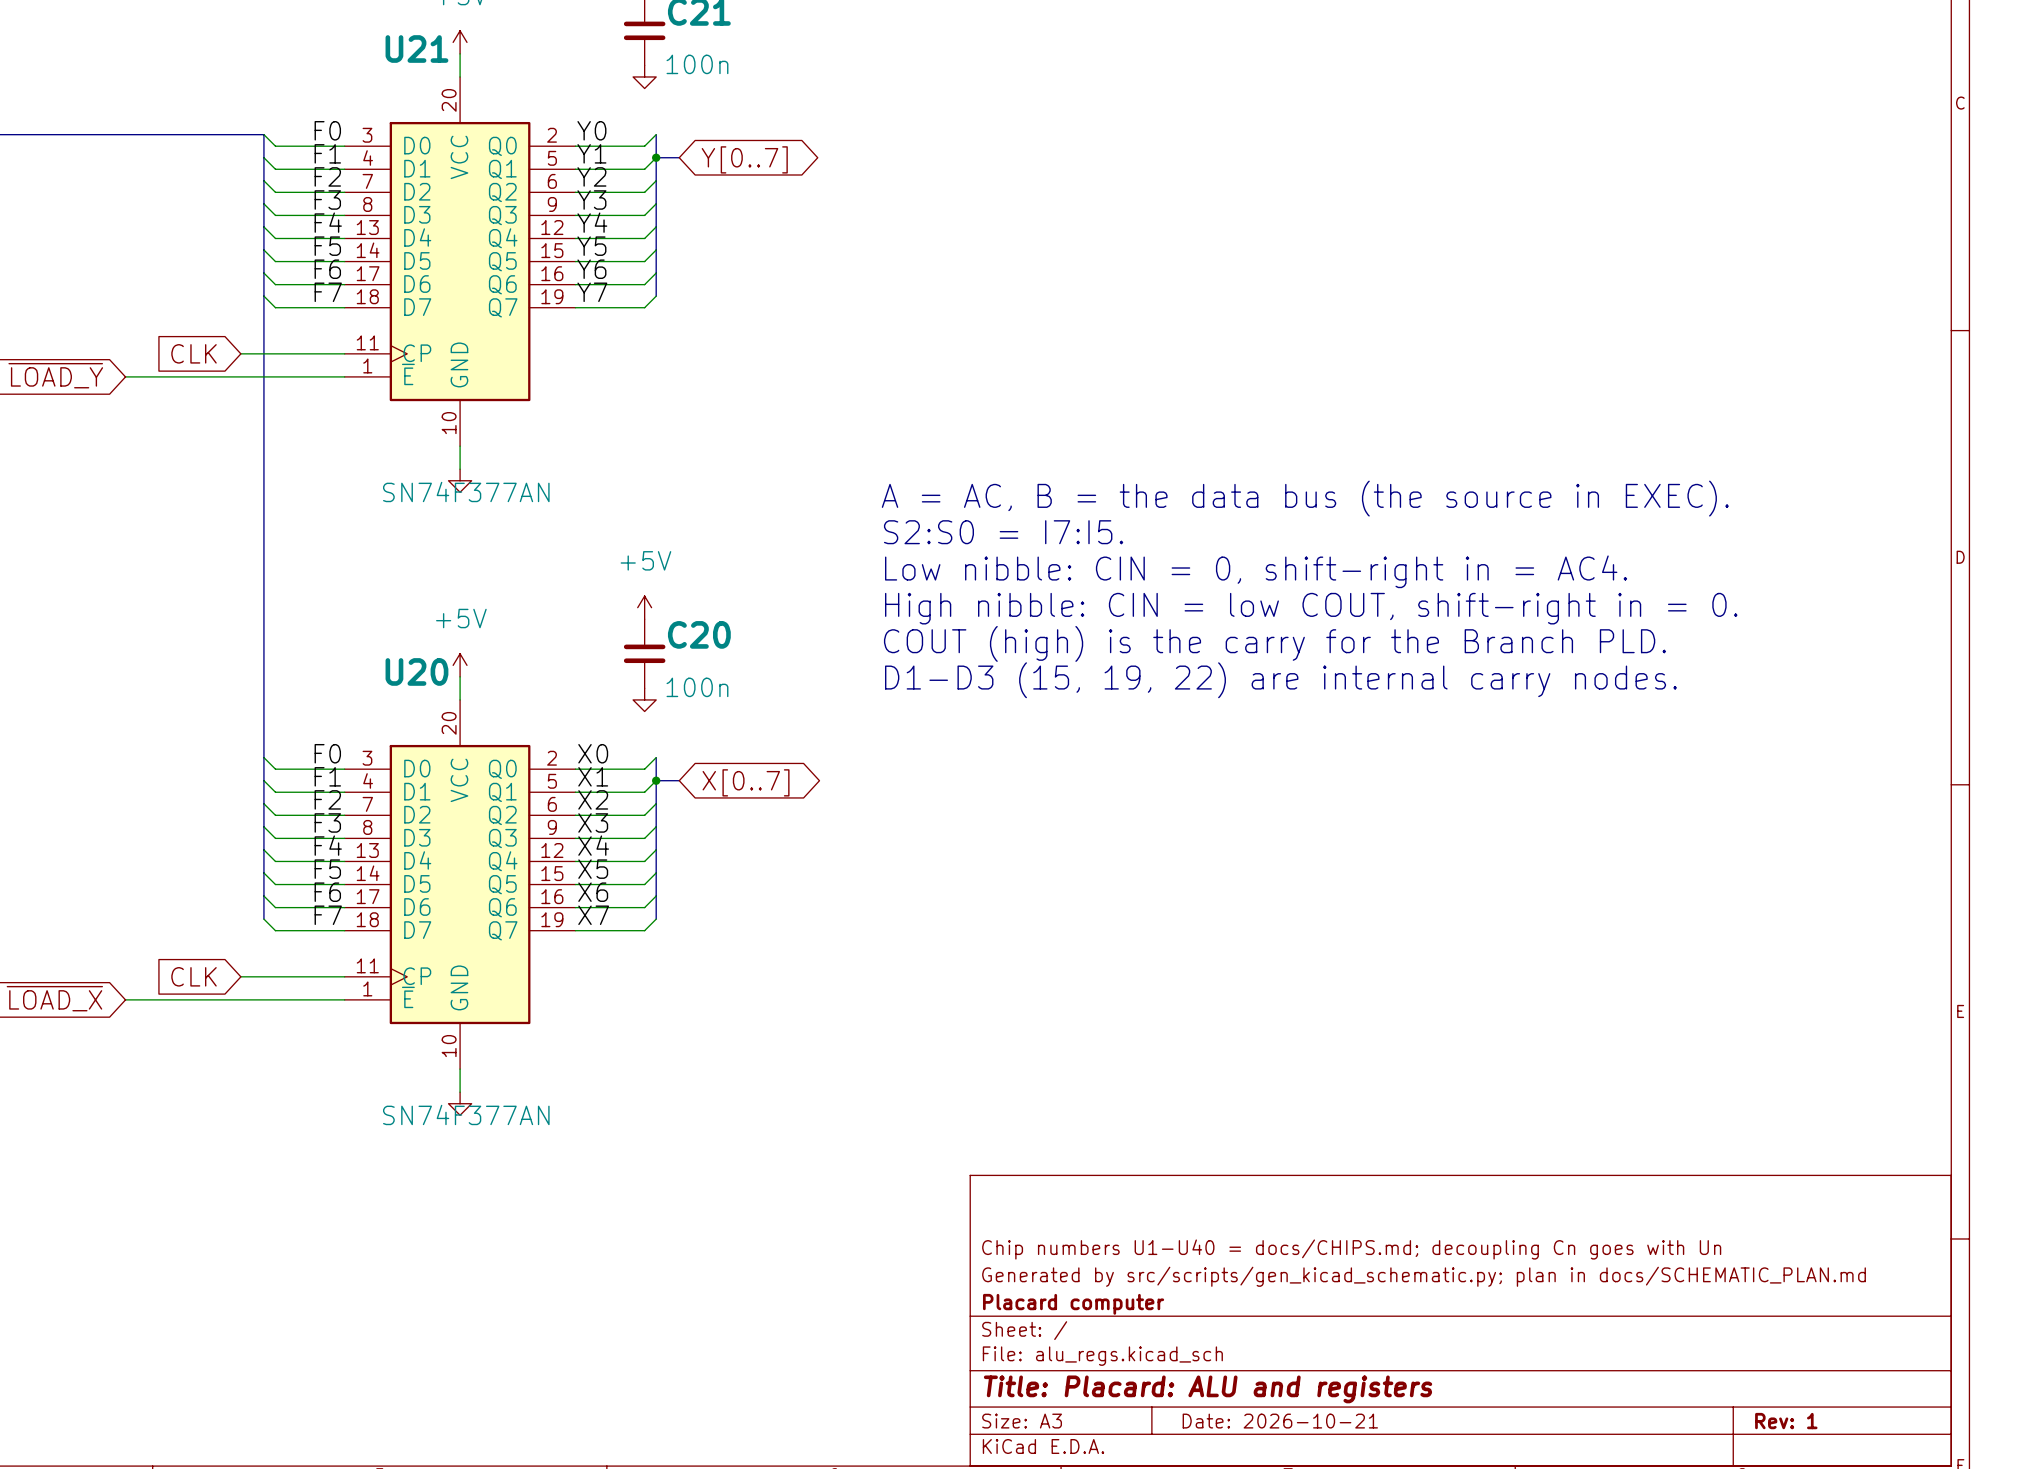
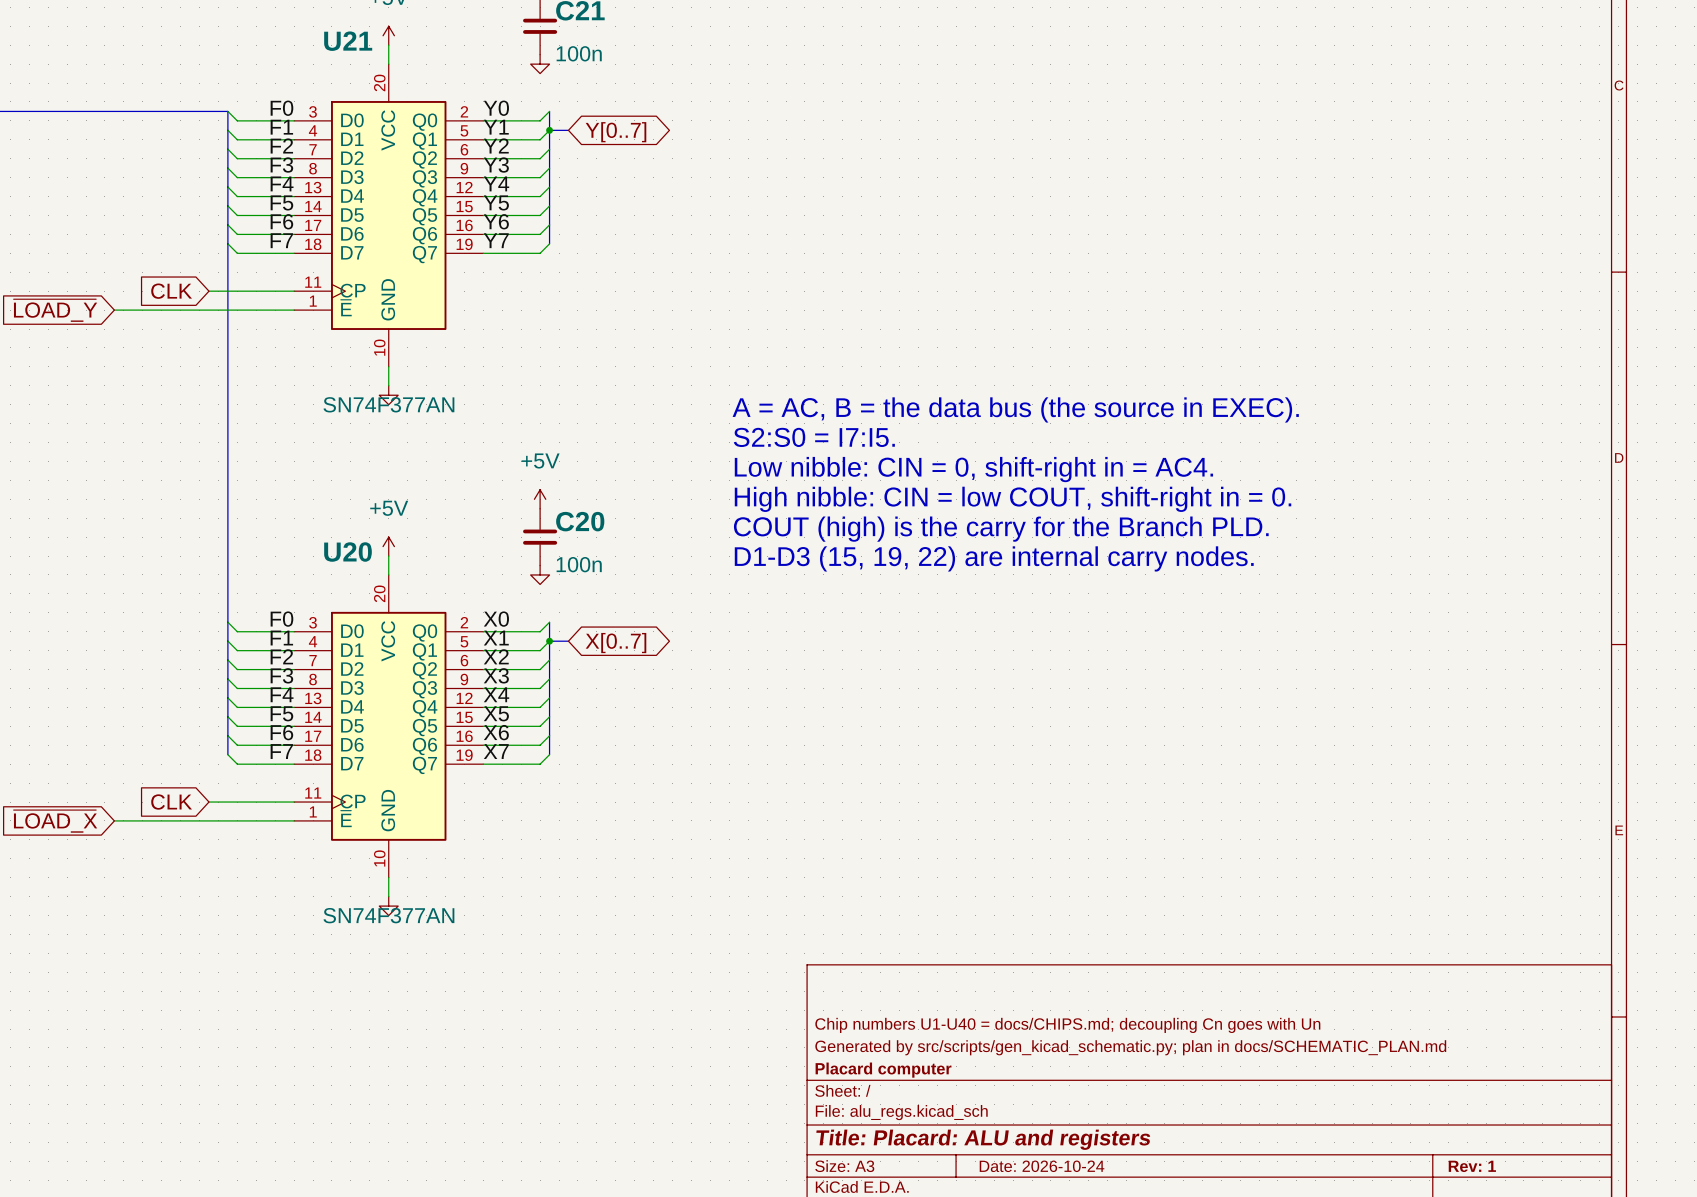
title block: Date: 2026-10-21 (1280, 1421) -> Date: 2026-10-24 (1042, 1166)

